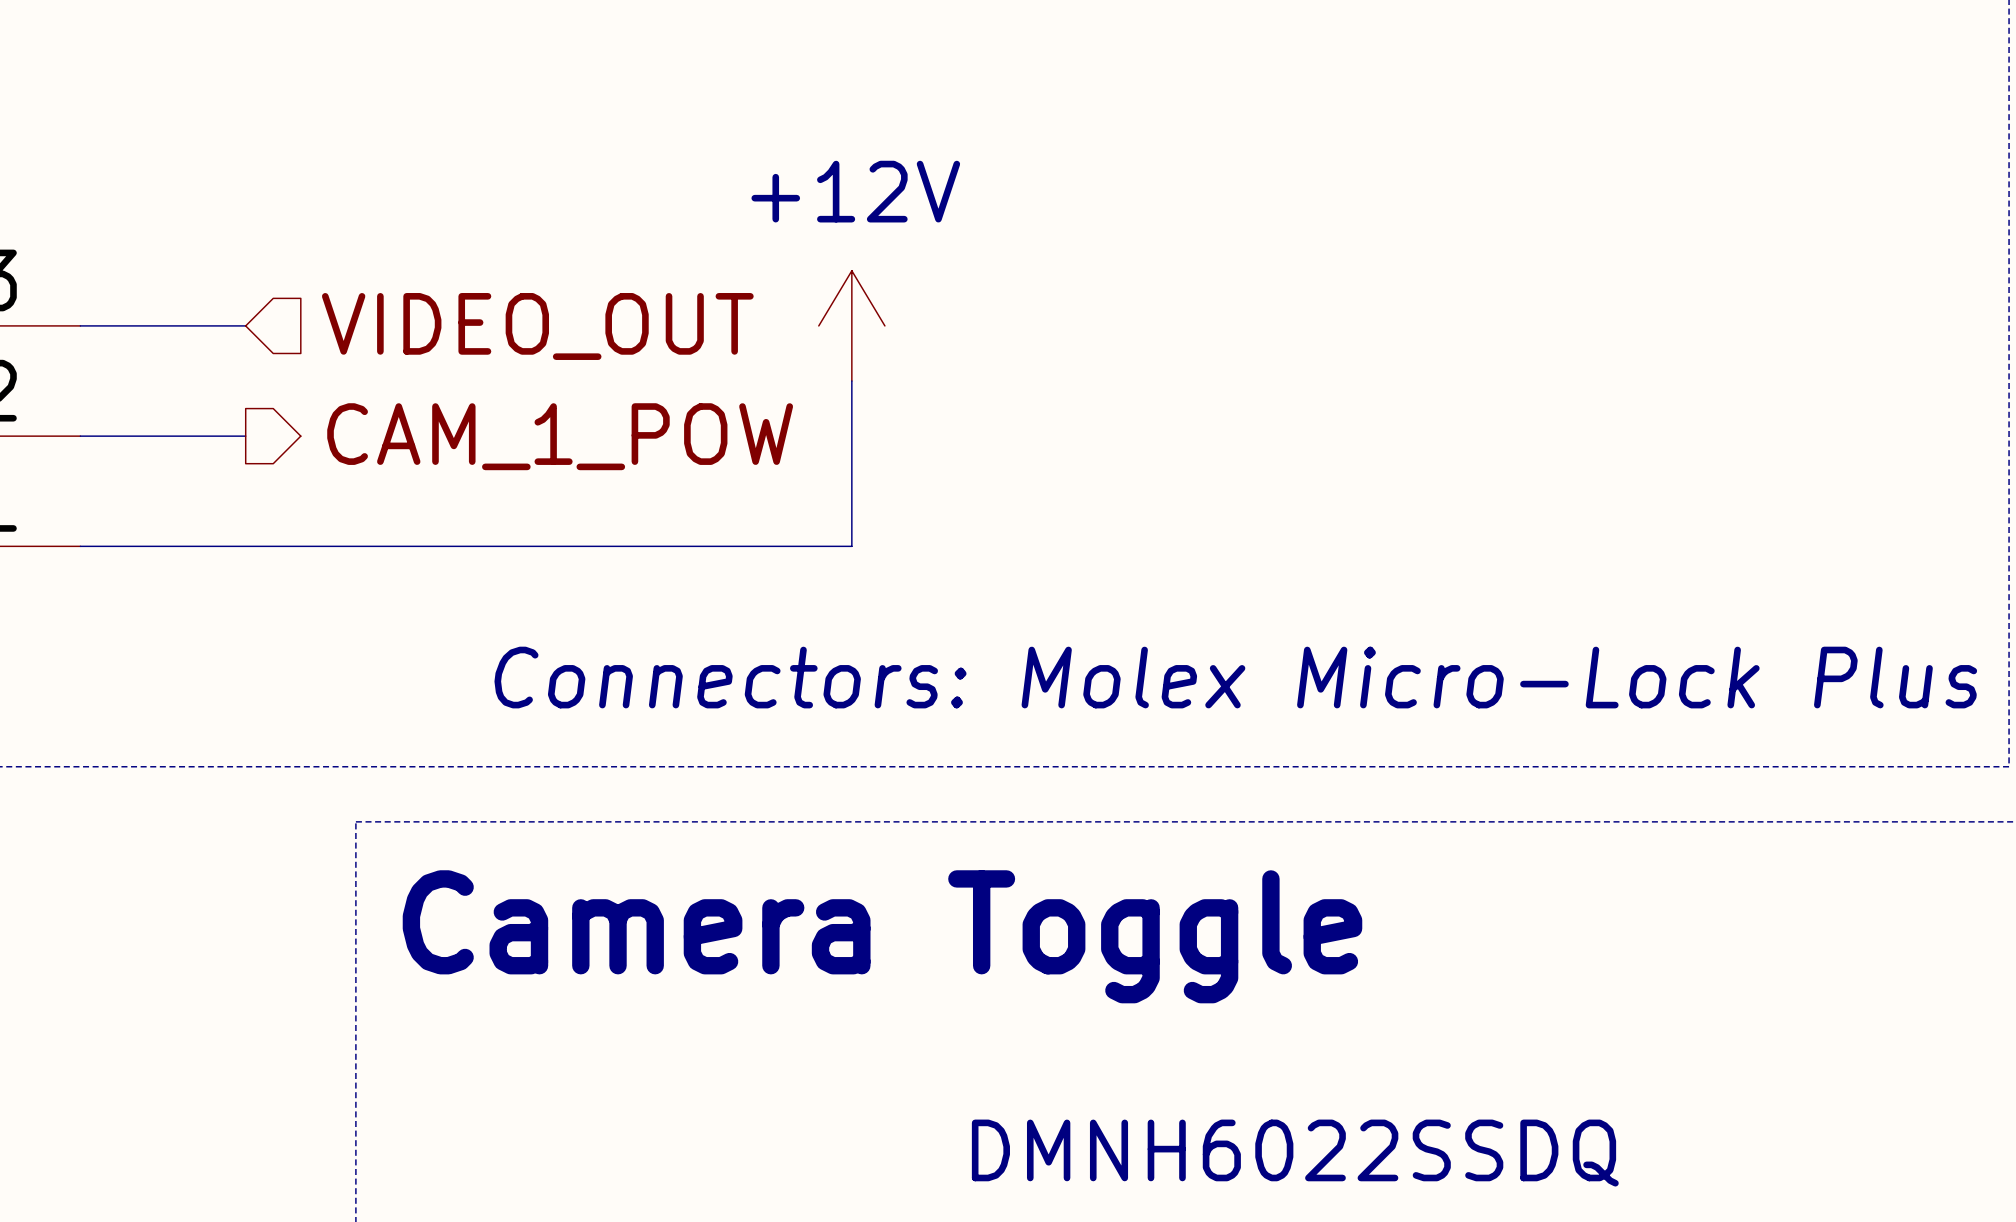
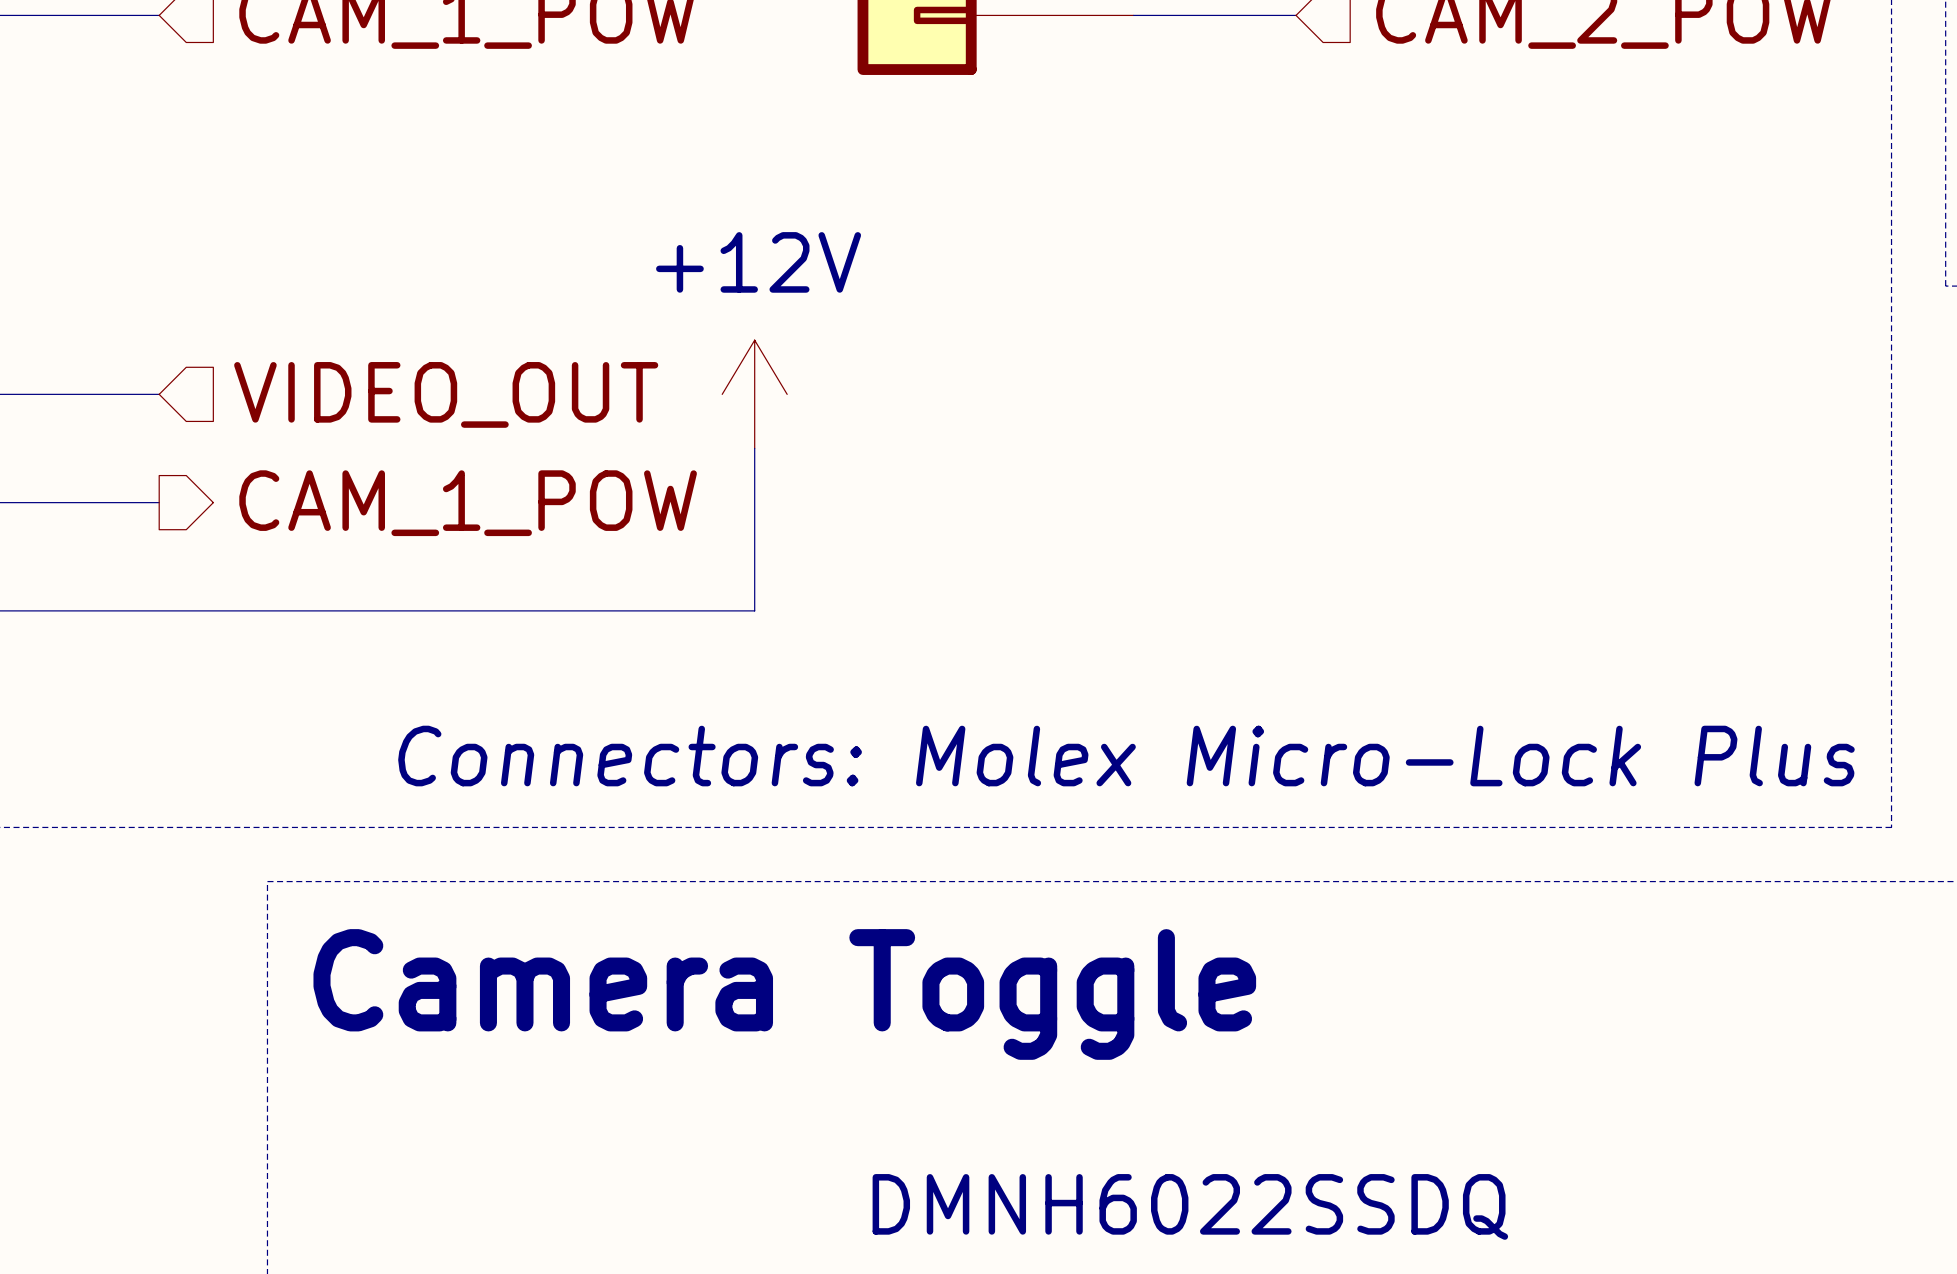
text position: Connectors: Molex Micro-Lock Plus (1235, 677) -> Connectors: Molex Micro-Lock Plus (1126, 756)

